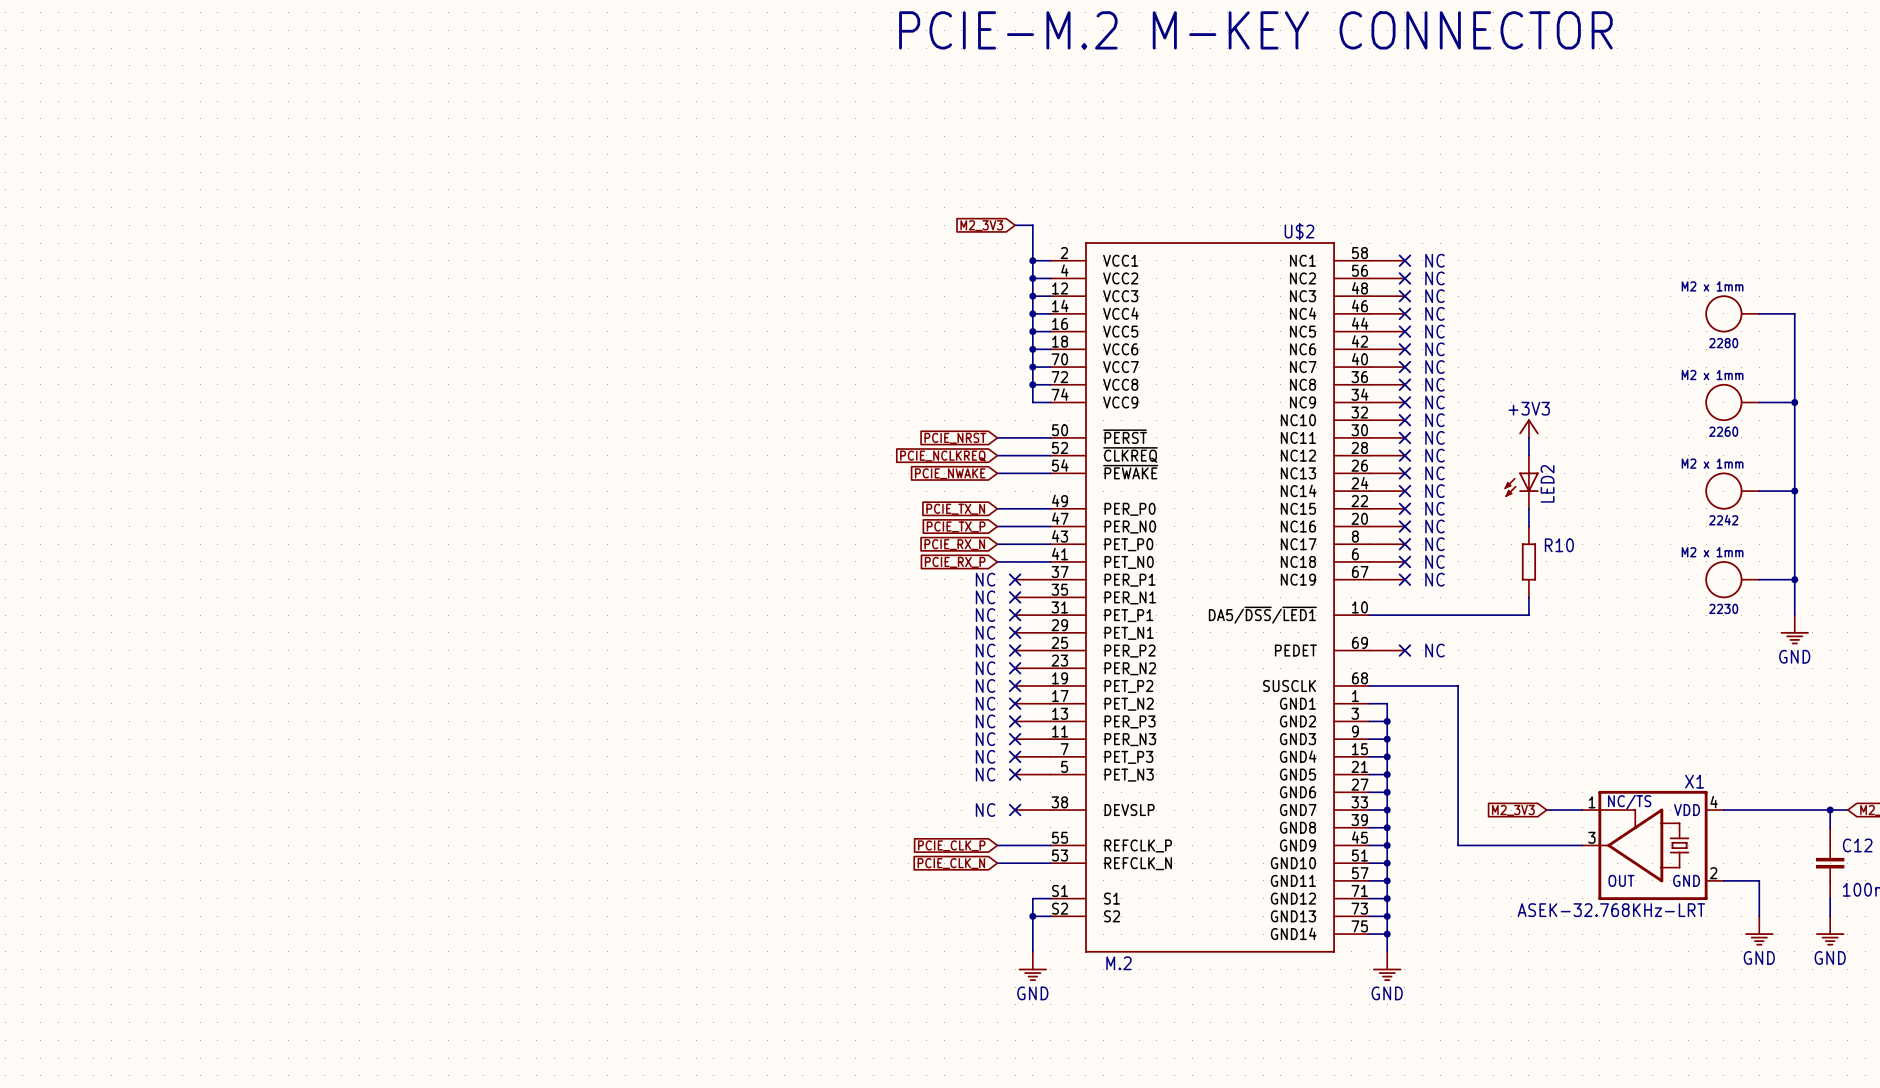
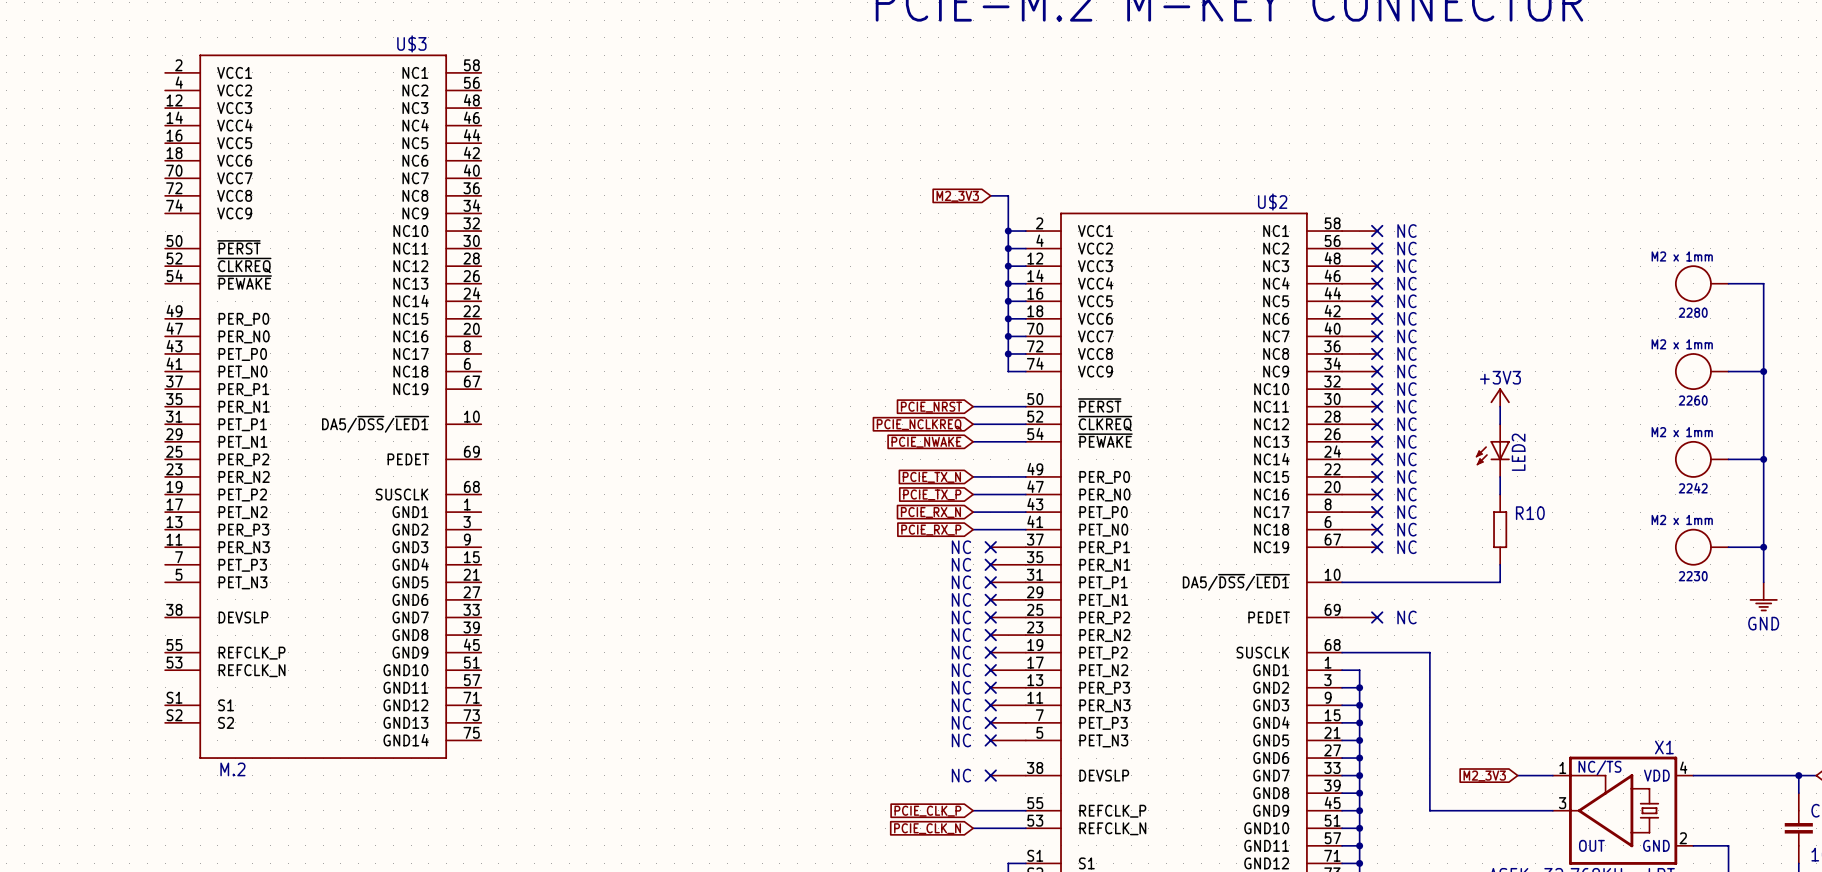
U$3: none -> M.2 (323, 406)

